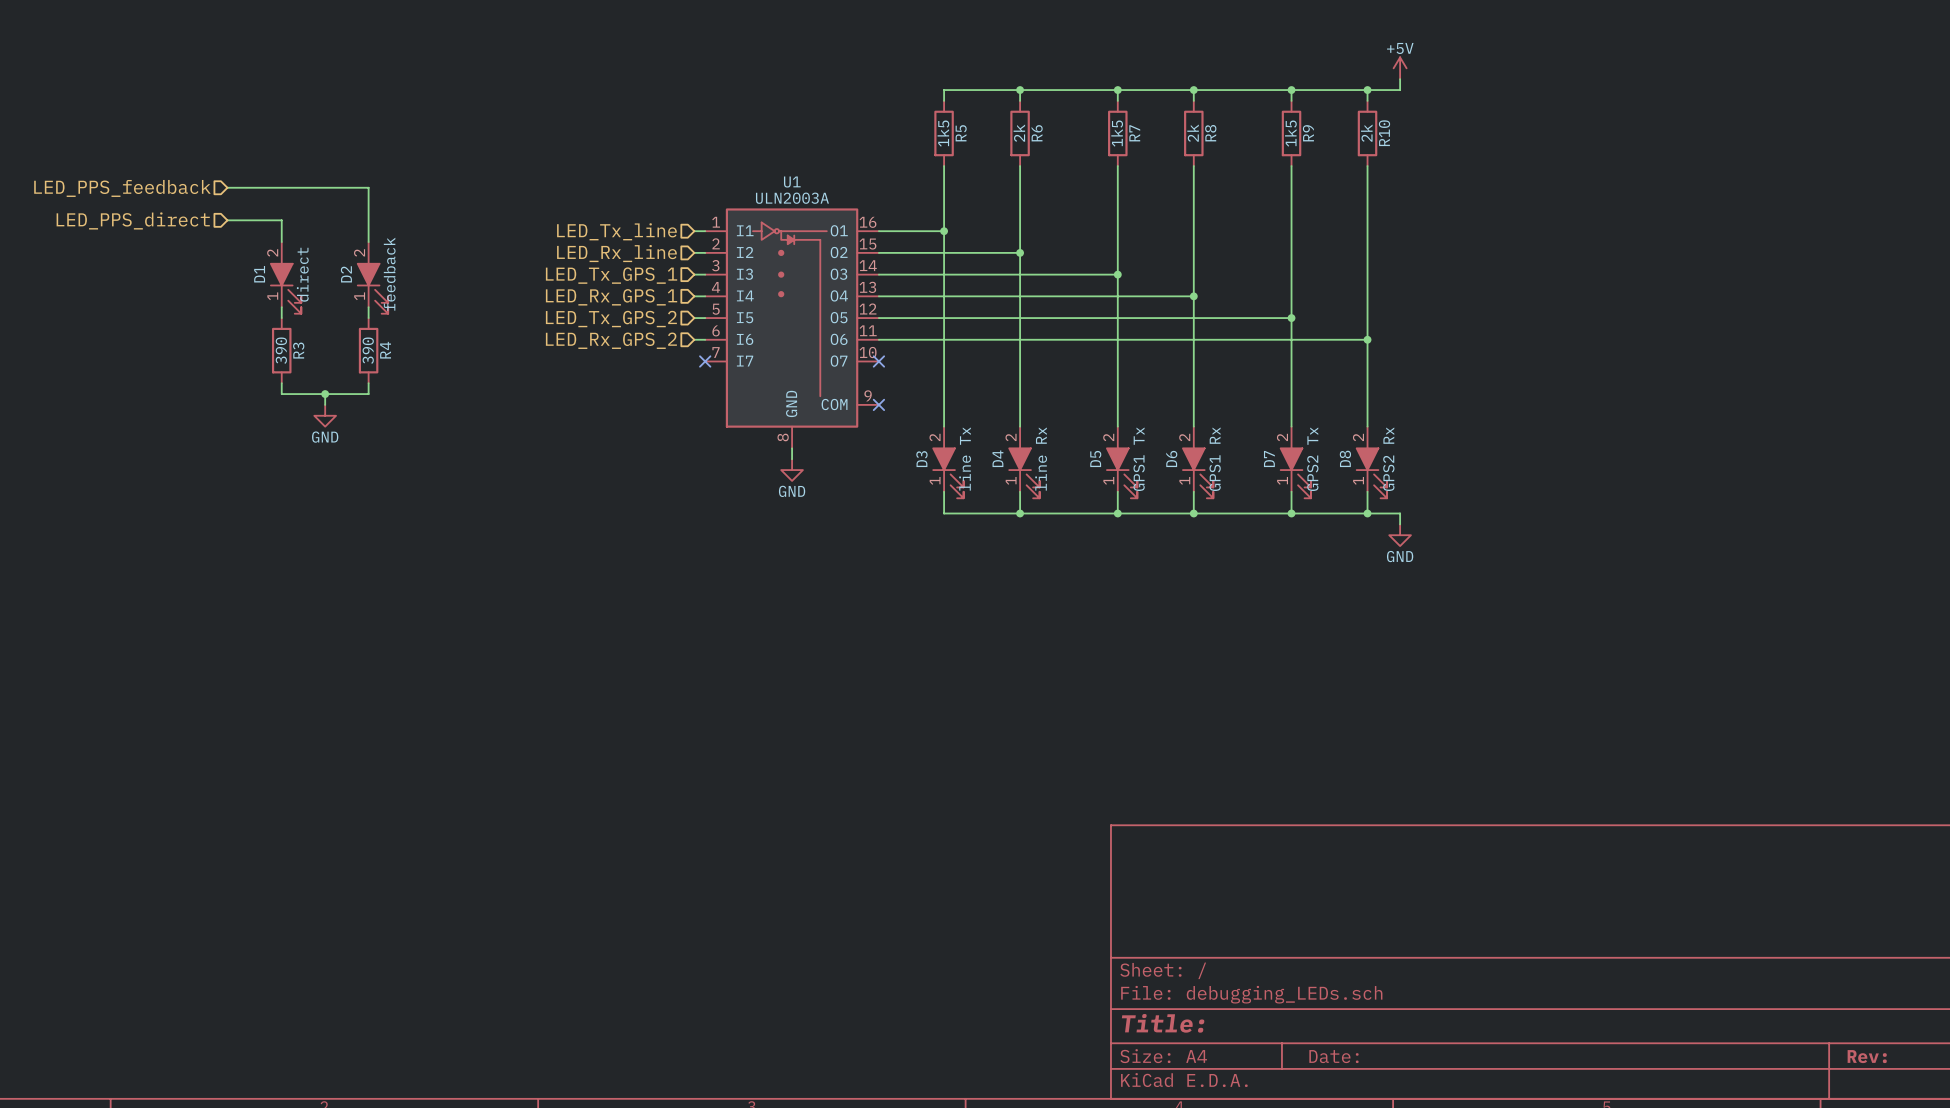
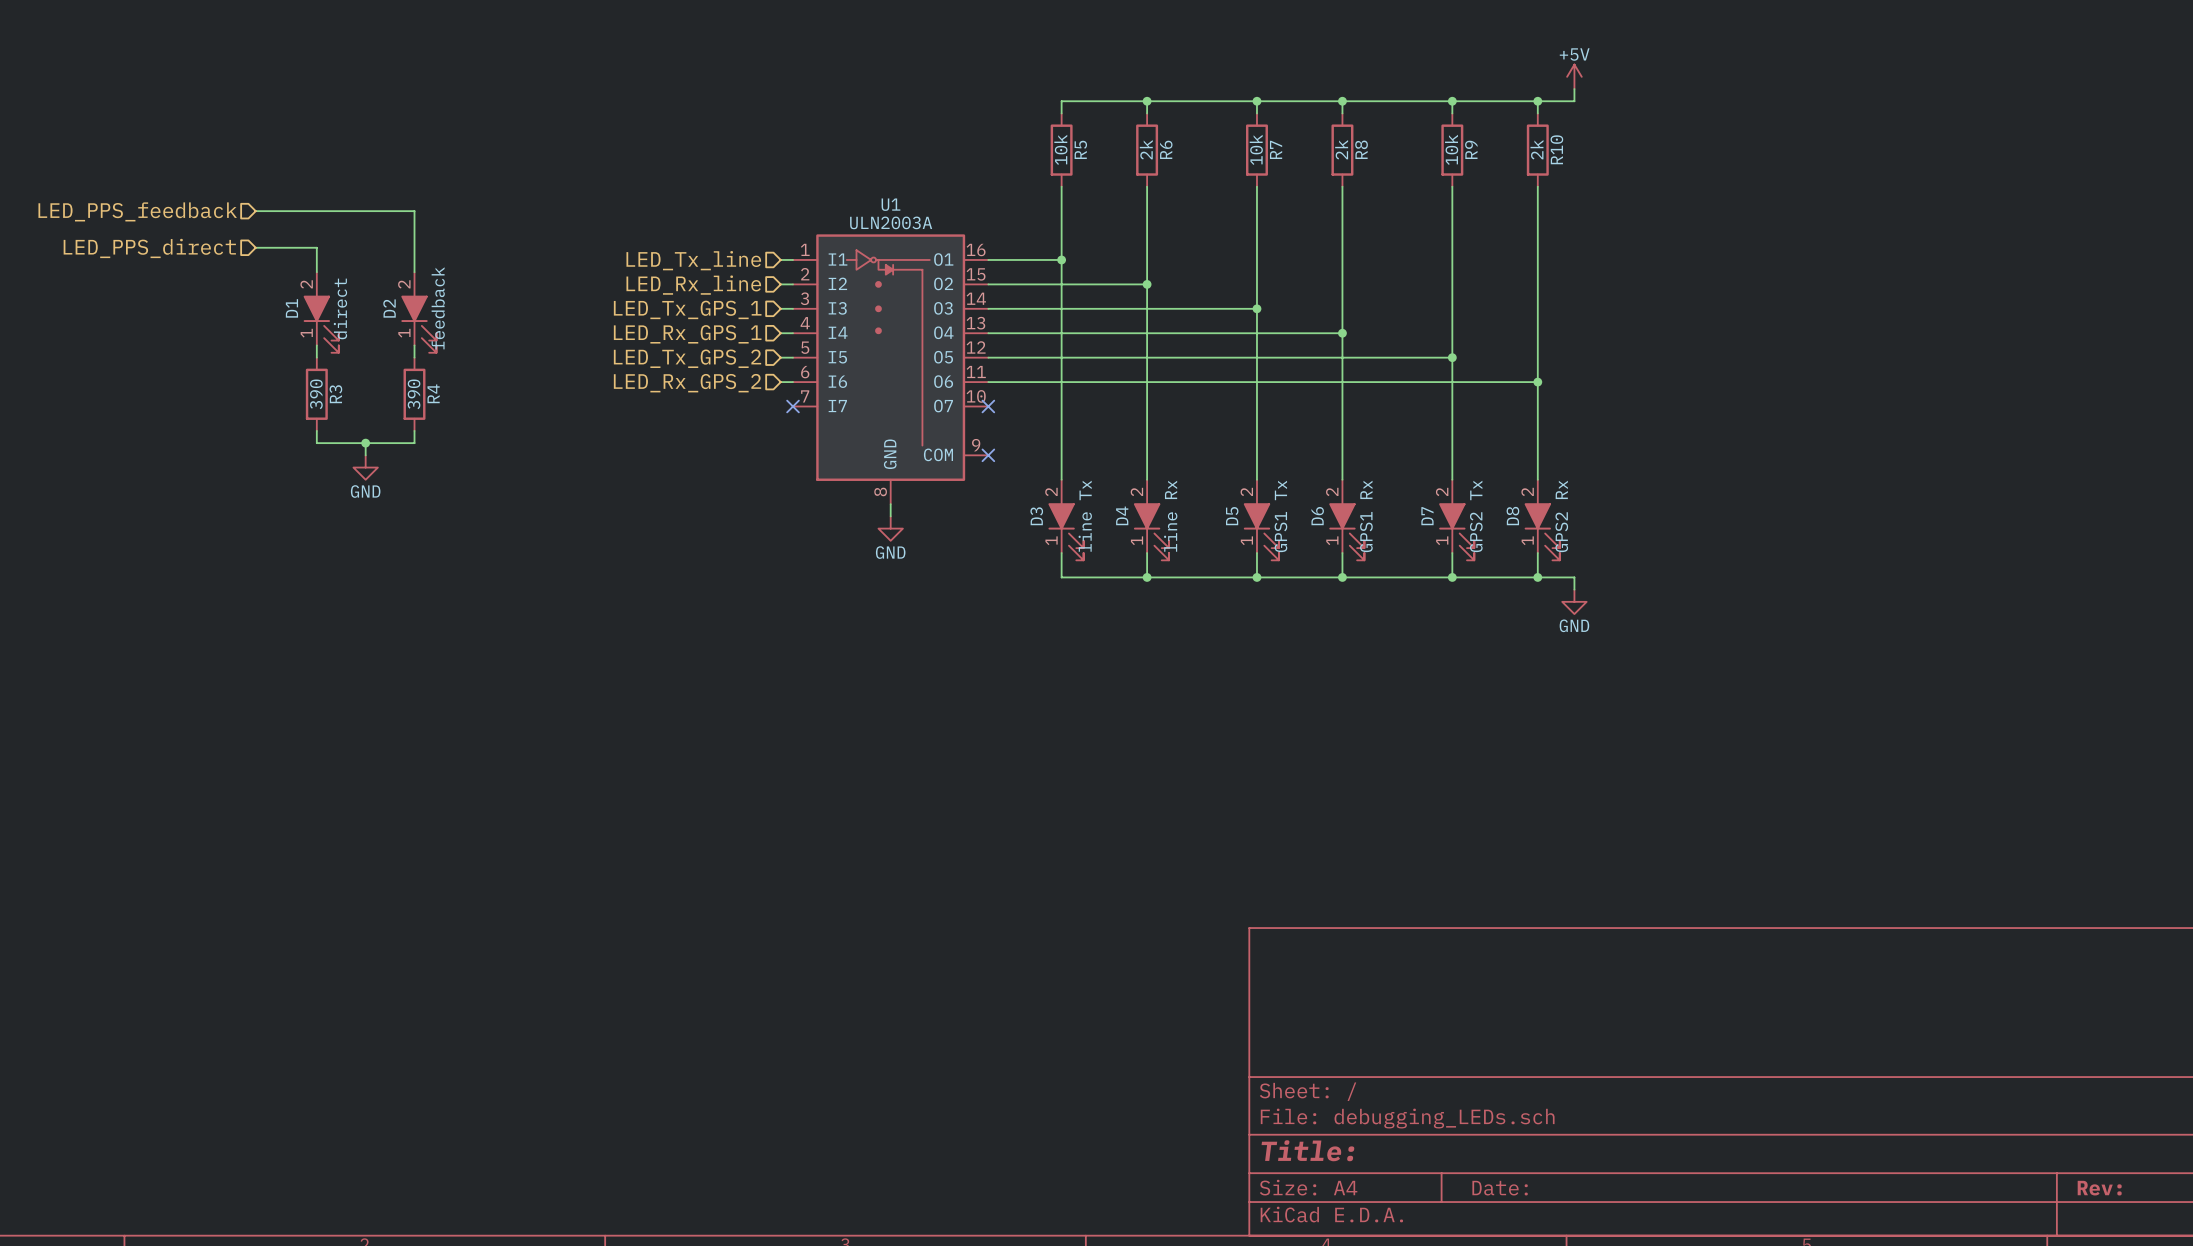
R5 value: 1k5 (943, 133) -> 10k (1060, 149)
R7 value: 1k5 (1117, 133) -> 10k (1256, 149)
R9 value: 1k5 (1290, 133) -> 10k (1451, 149)

